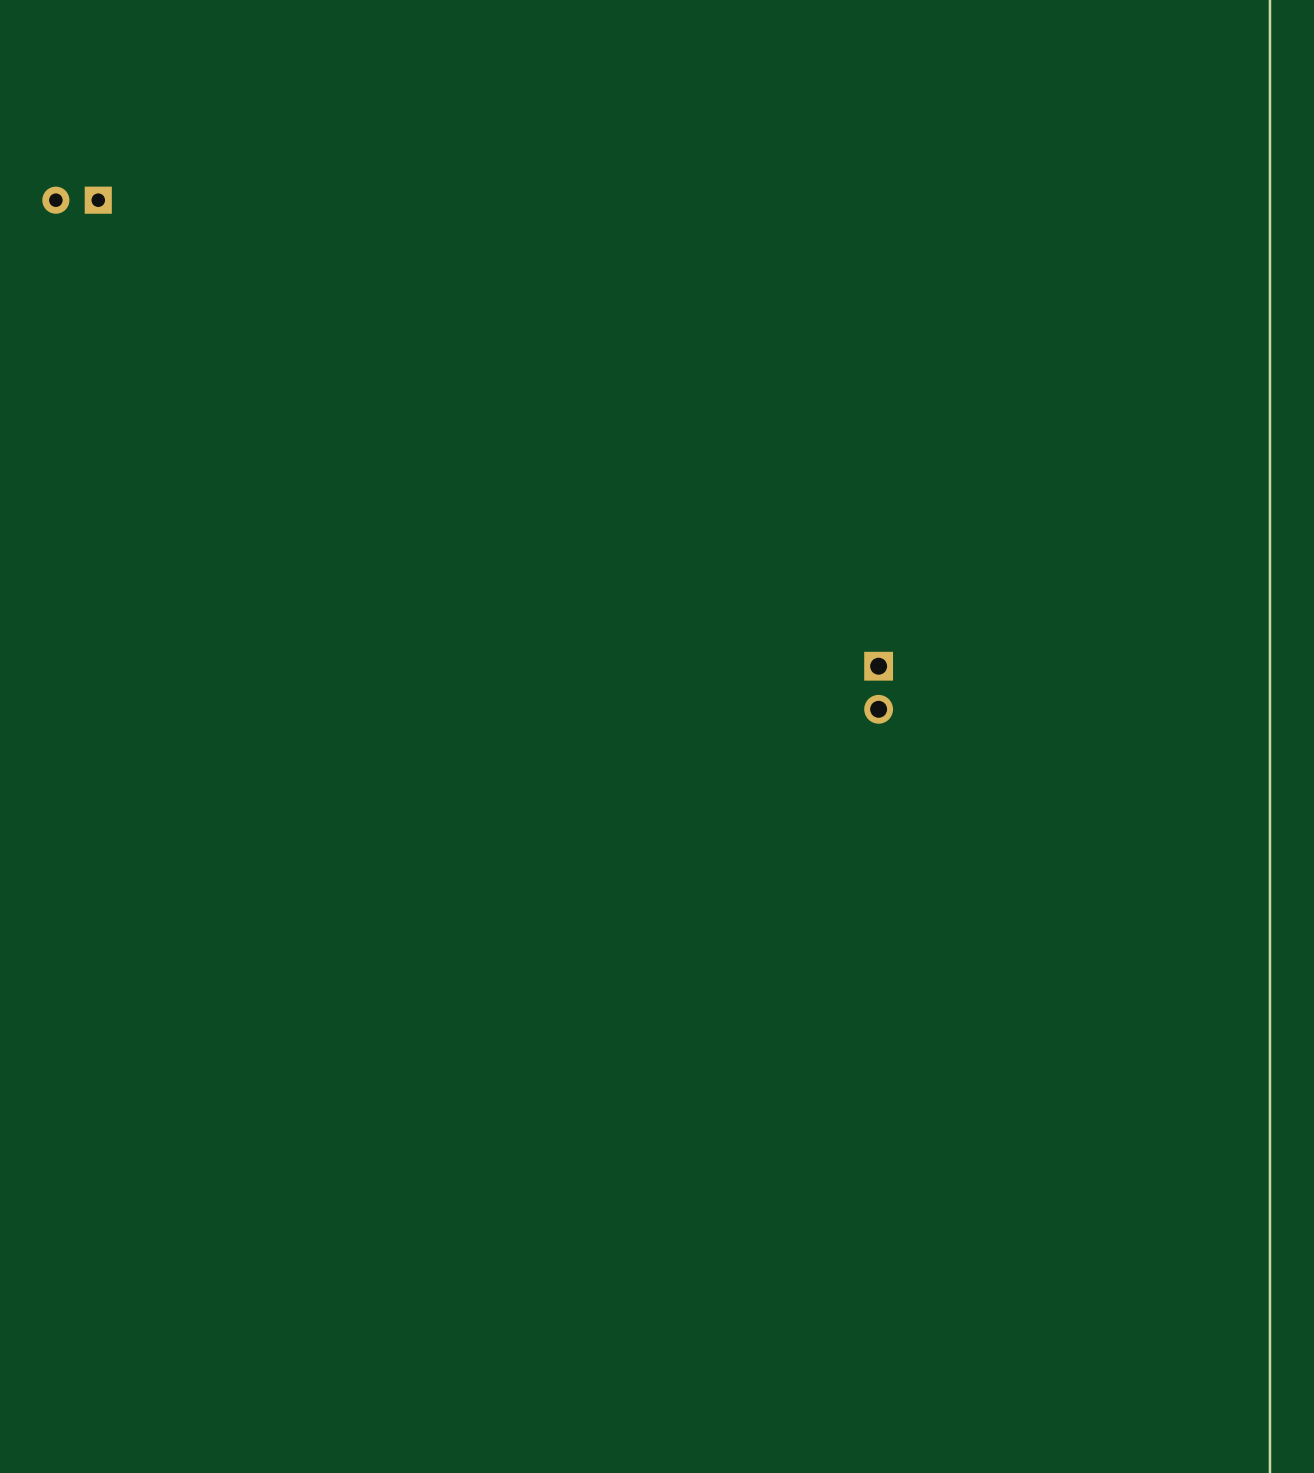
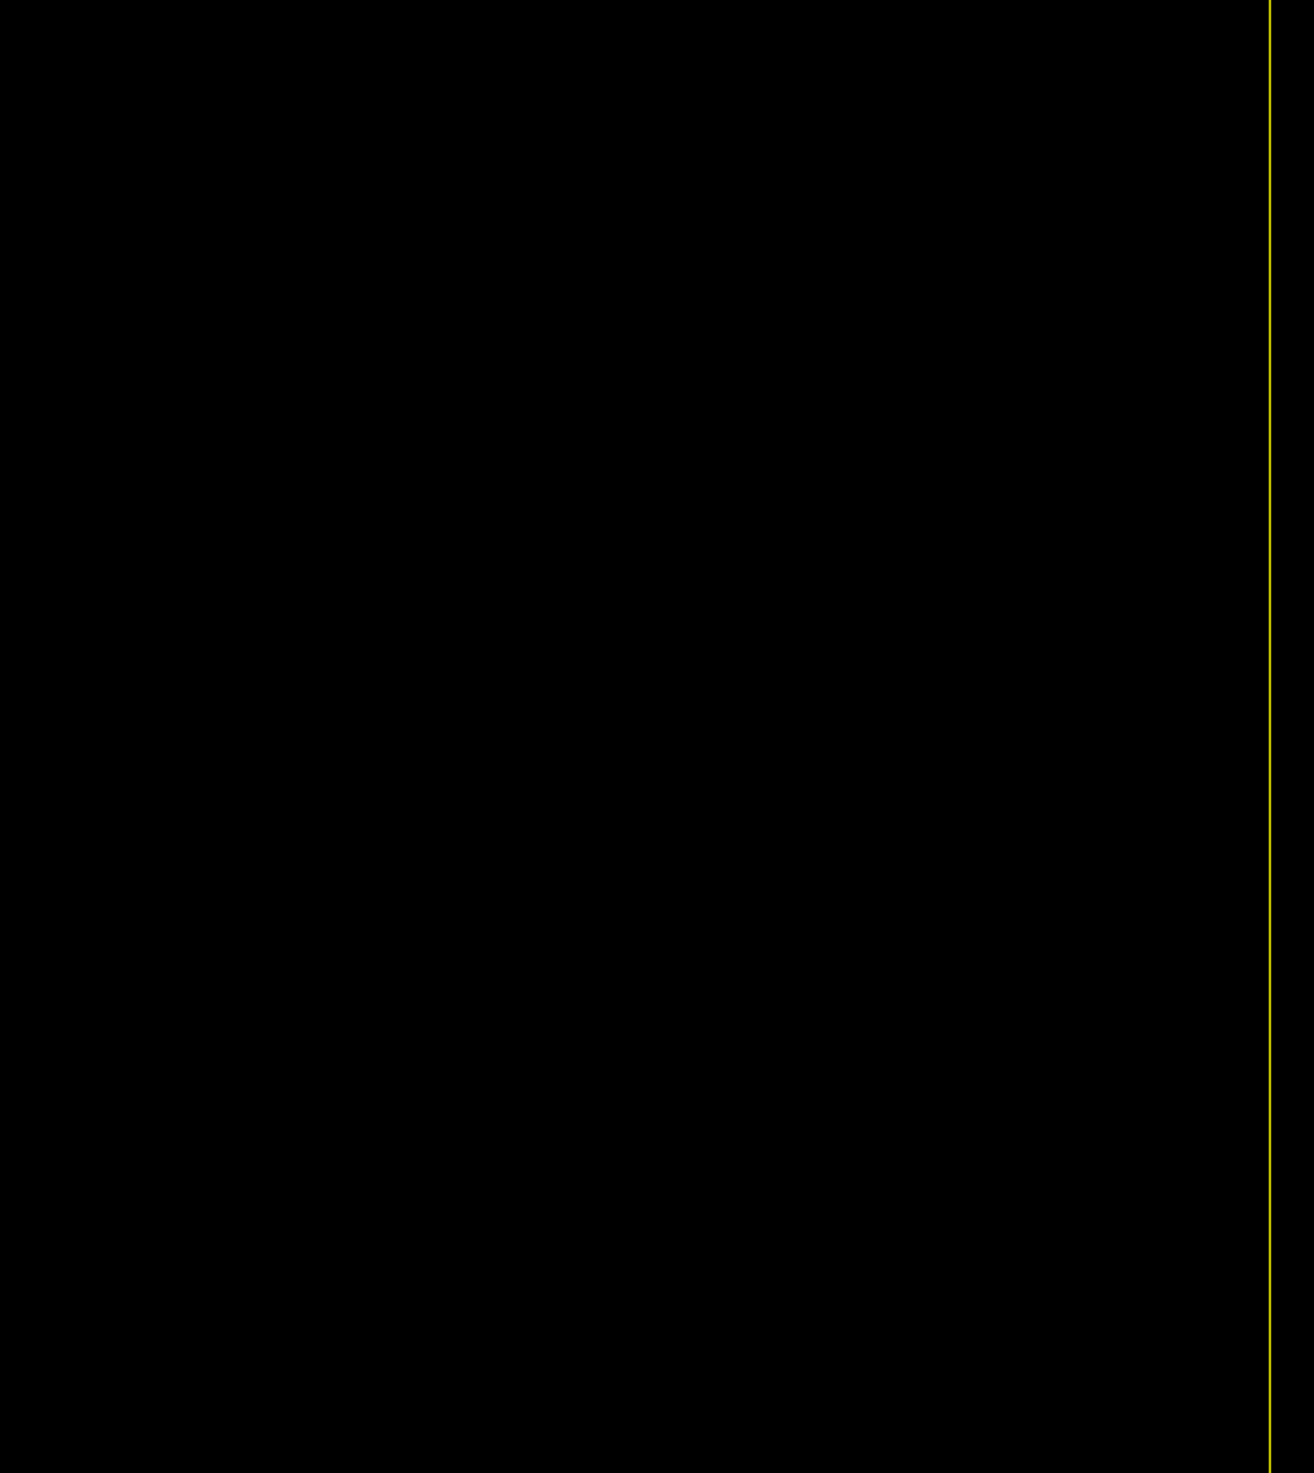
part: (77, 200) -> none
part: (878, 687) -> none

